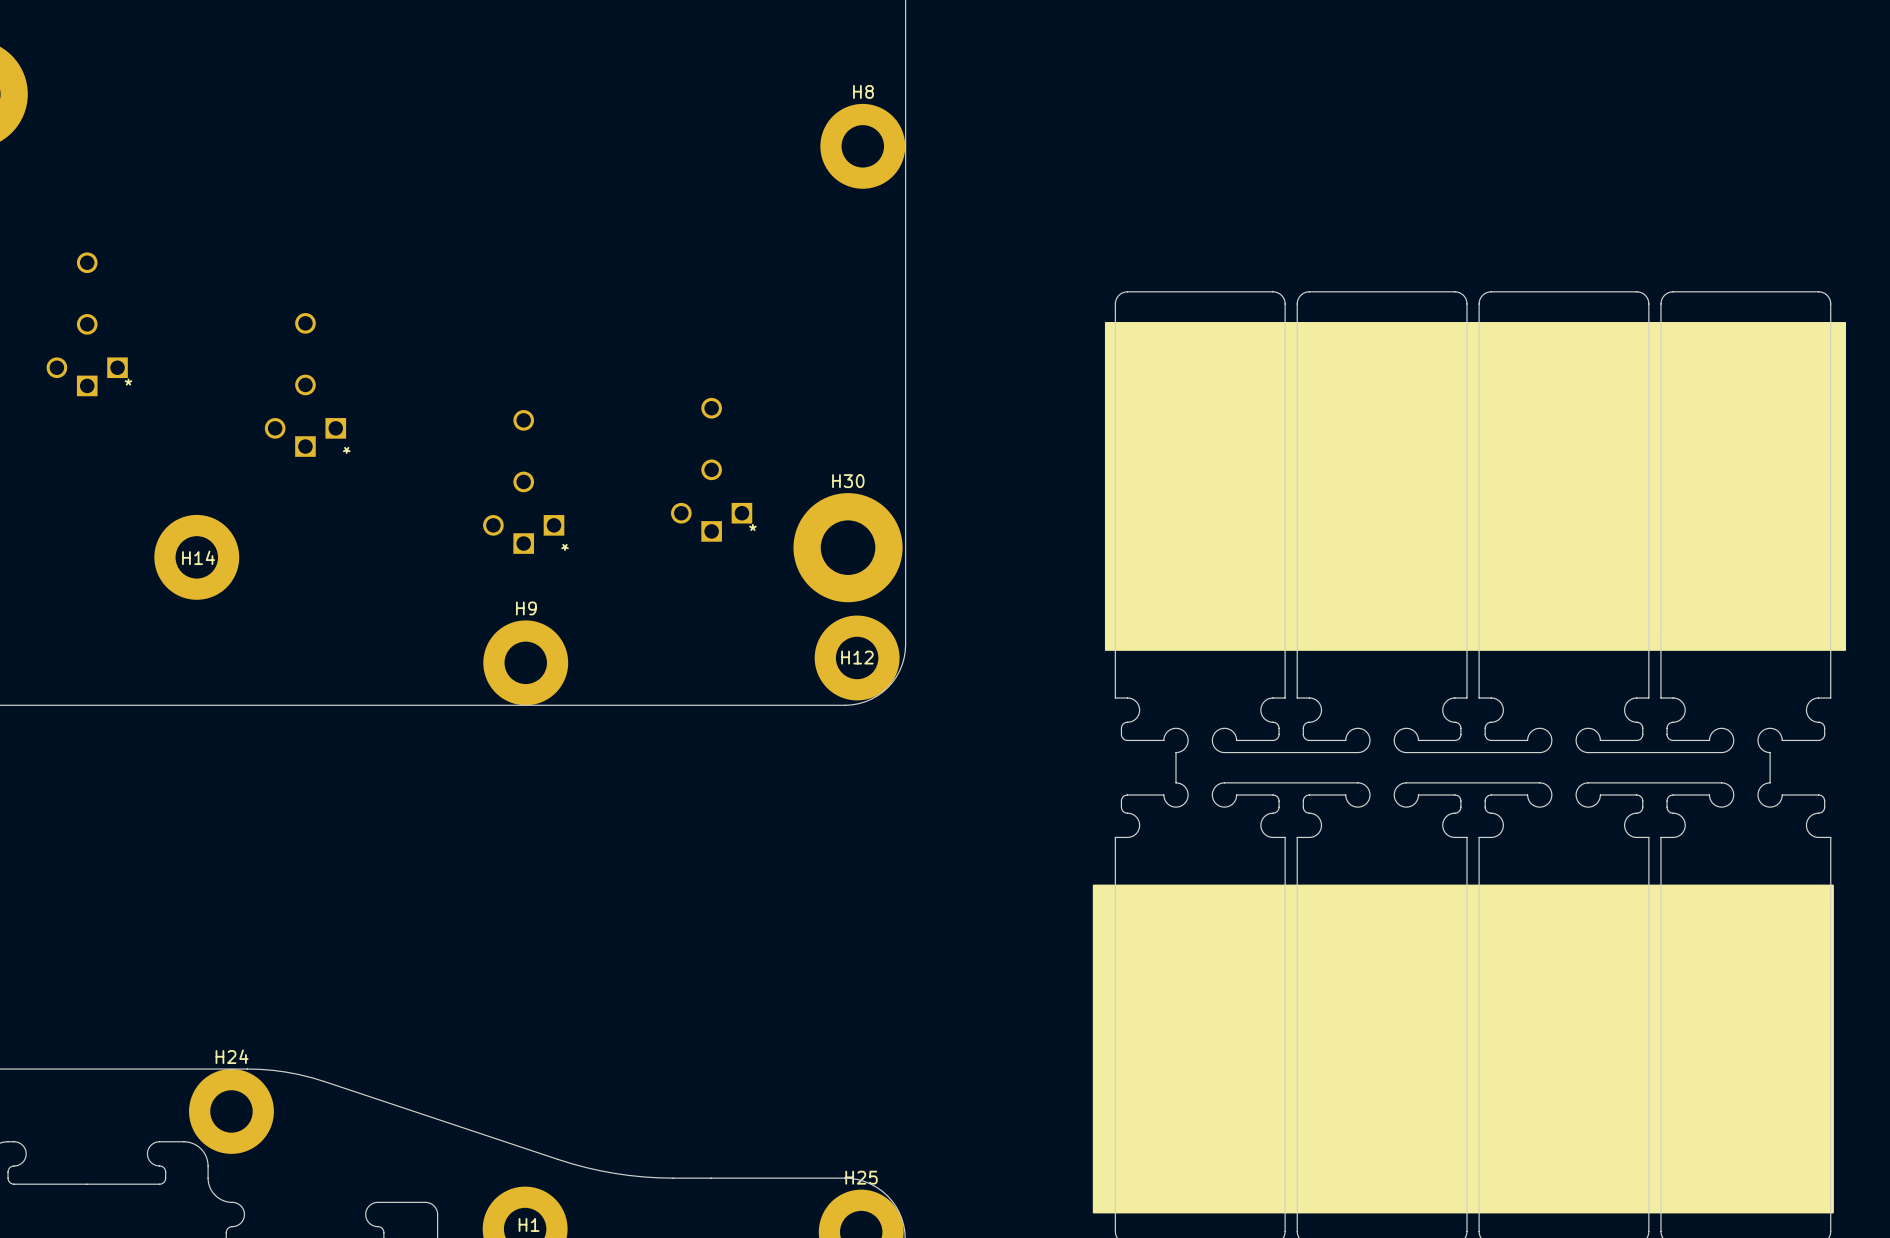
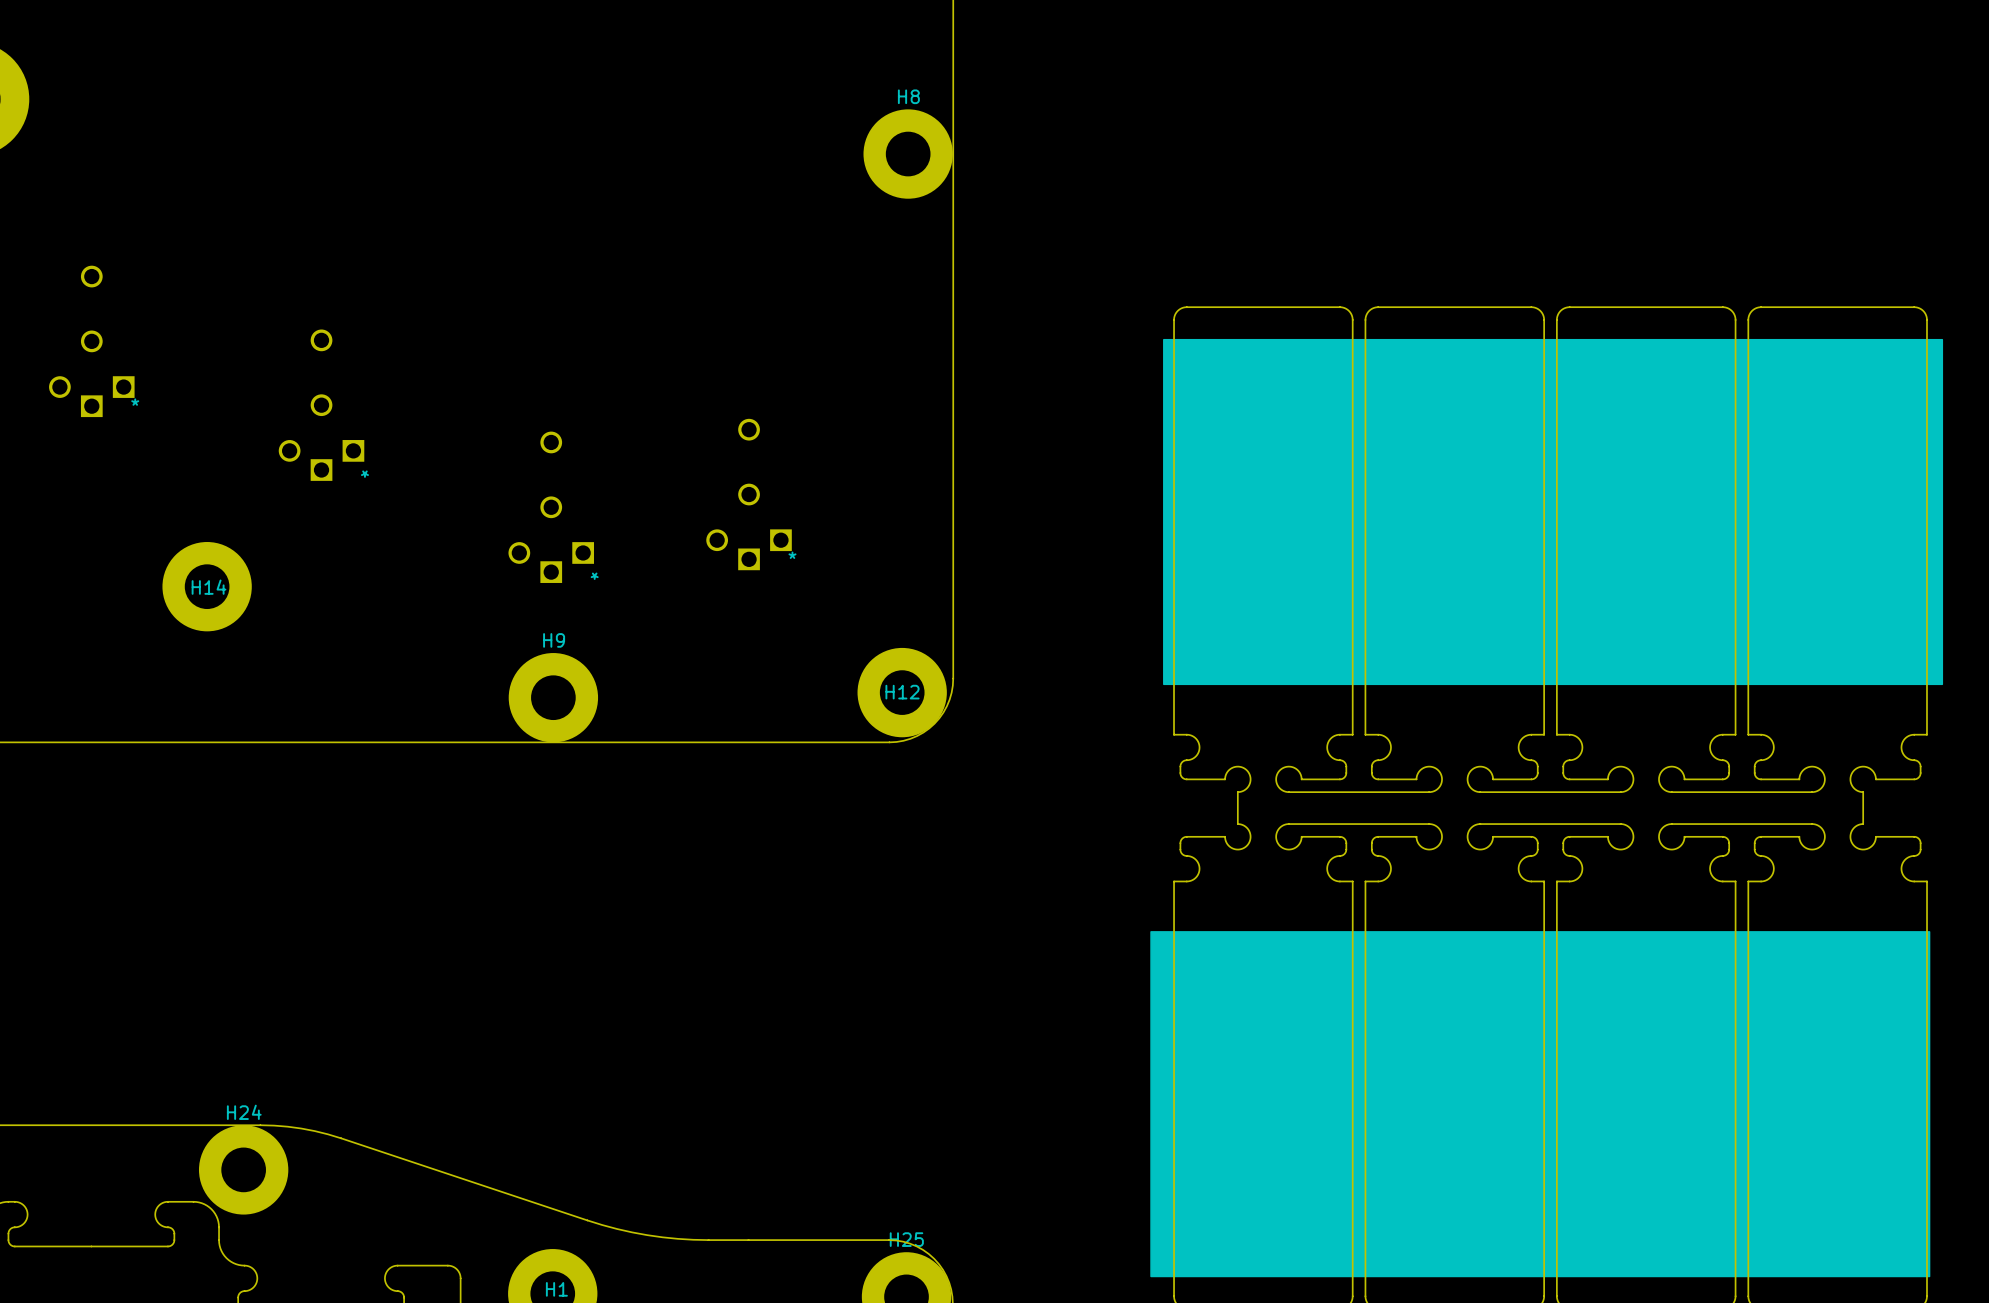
H30: (848, 547) -> none

